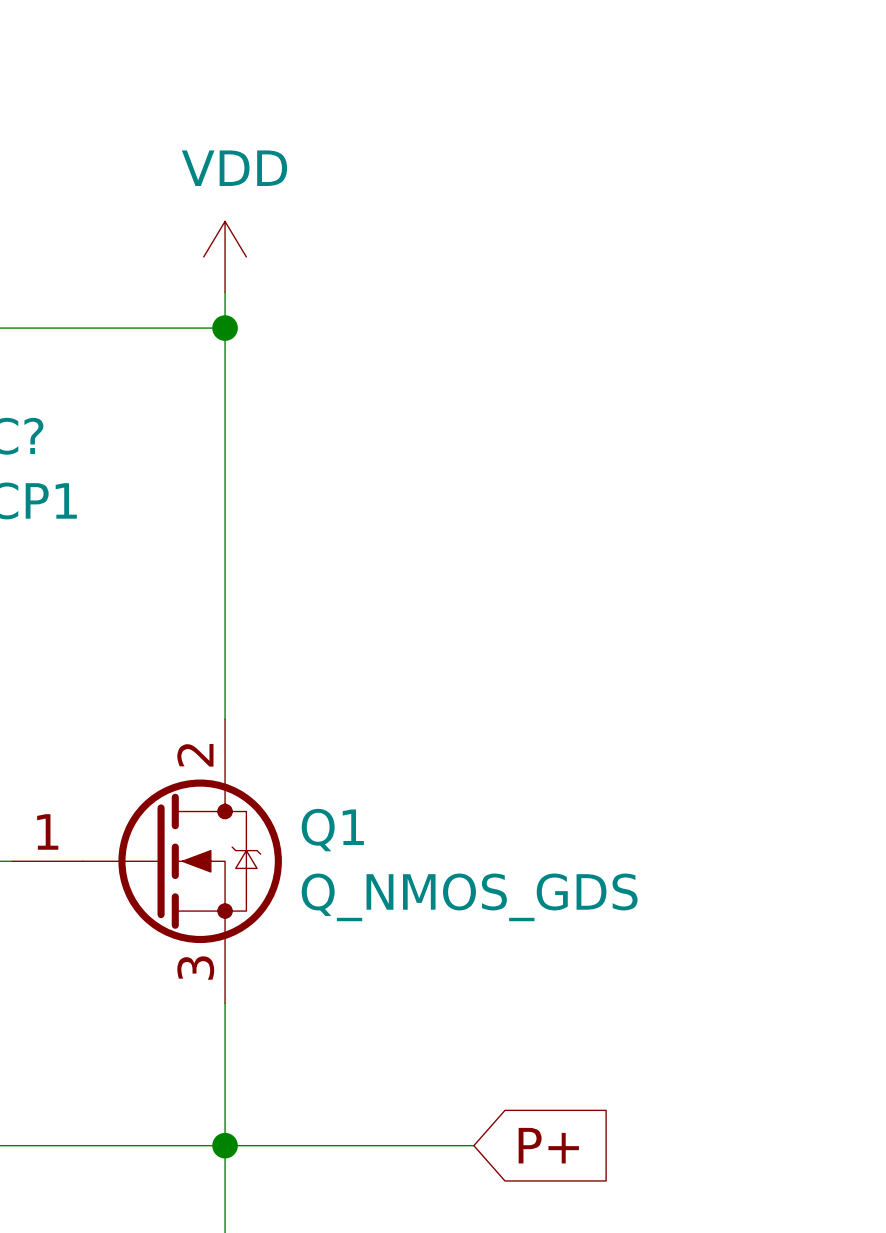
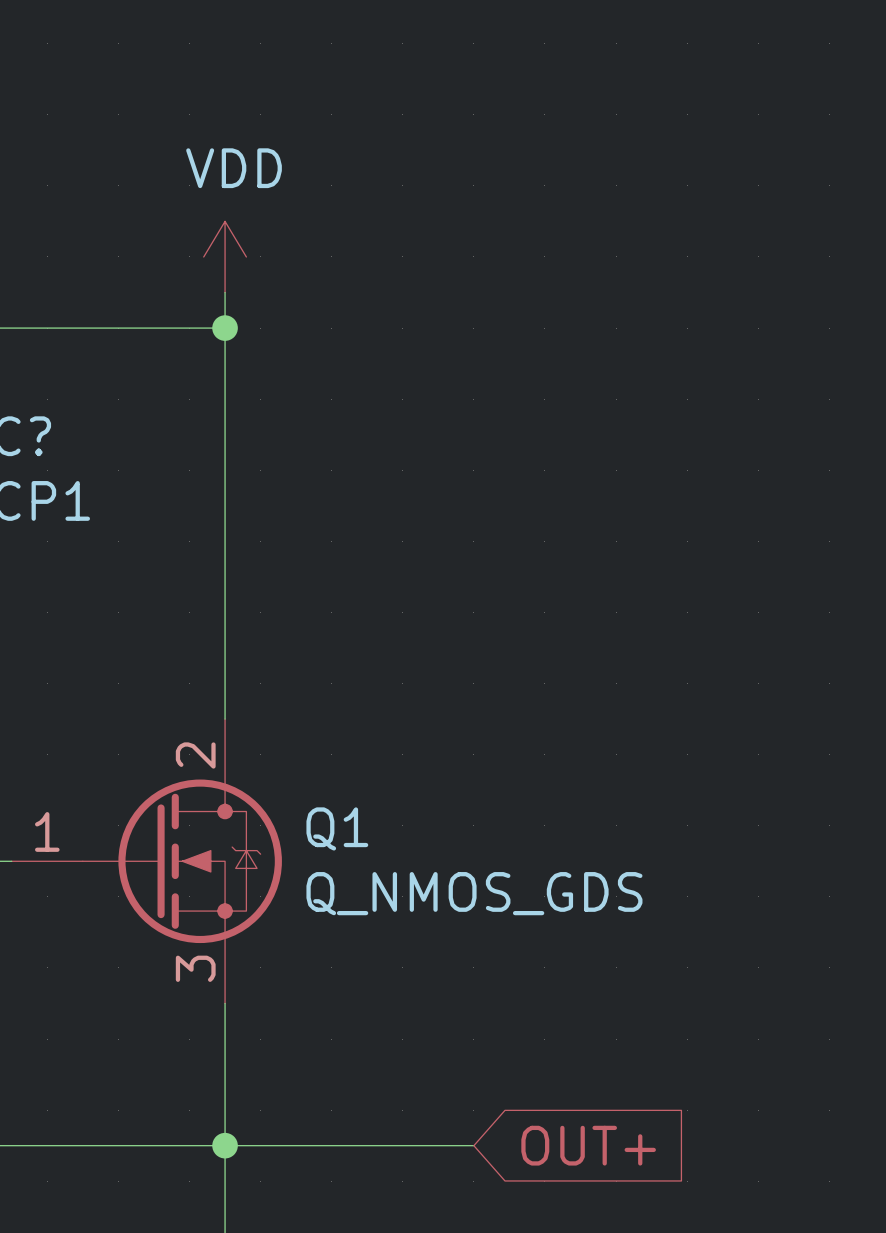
global label: P+ (548, 1145) -> OUT+ (588, 1145)

